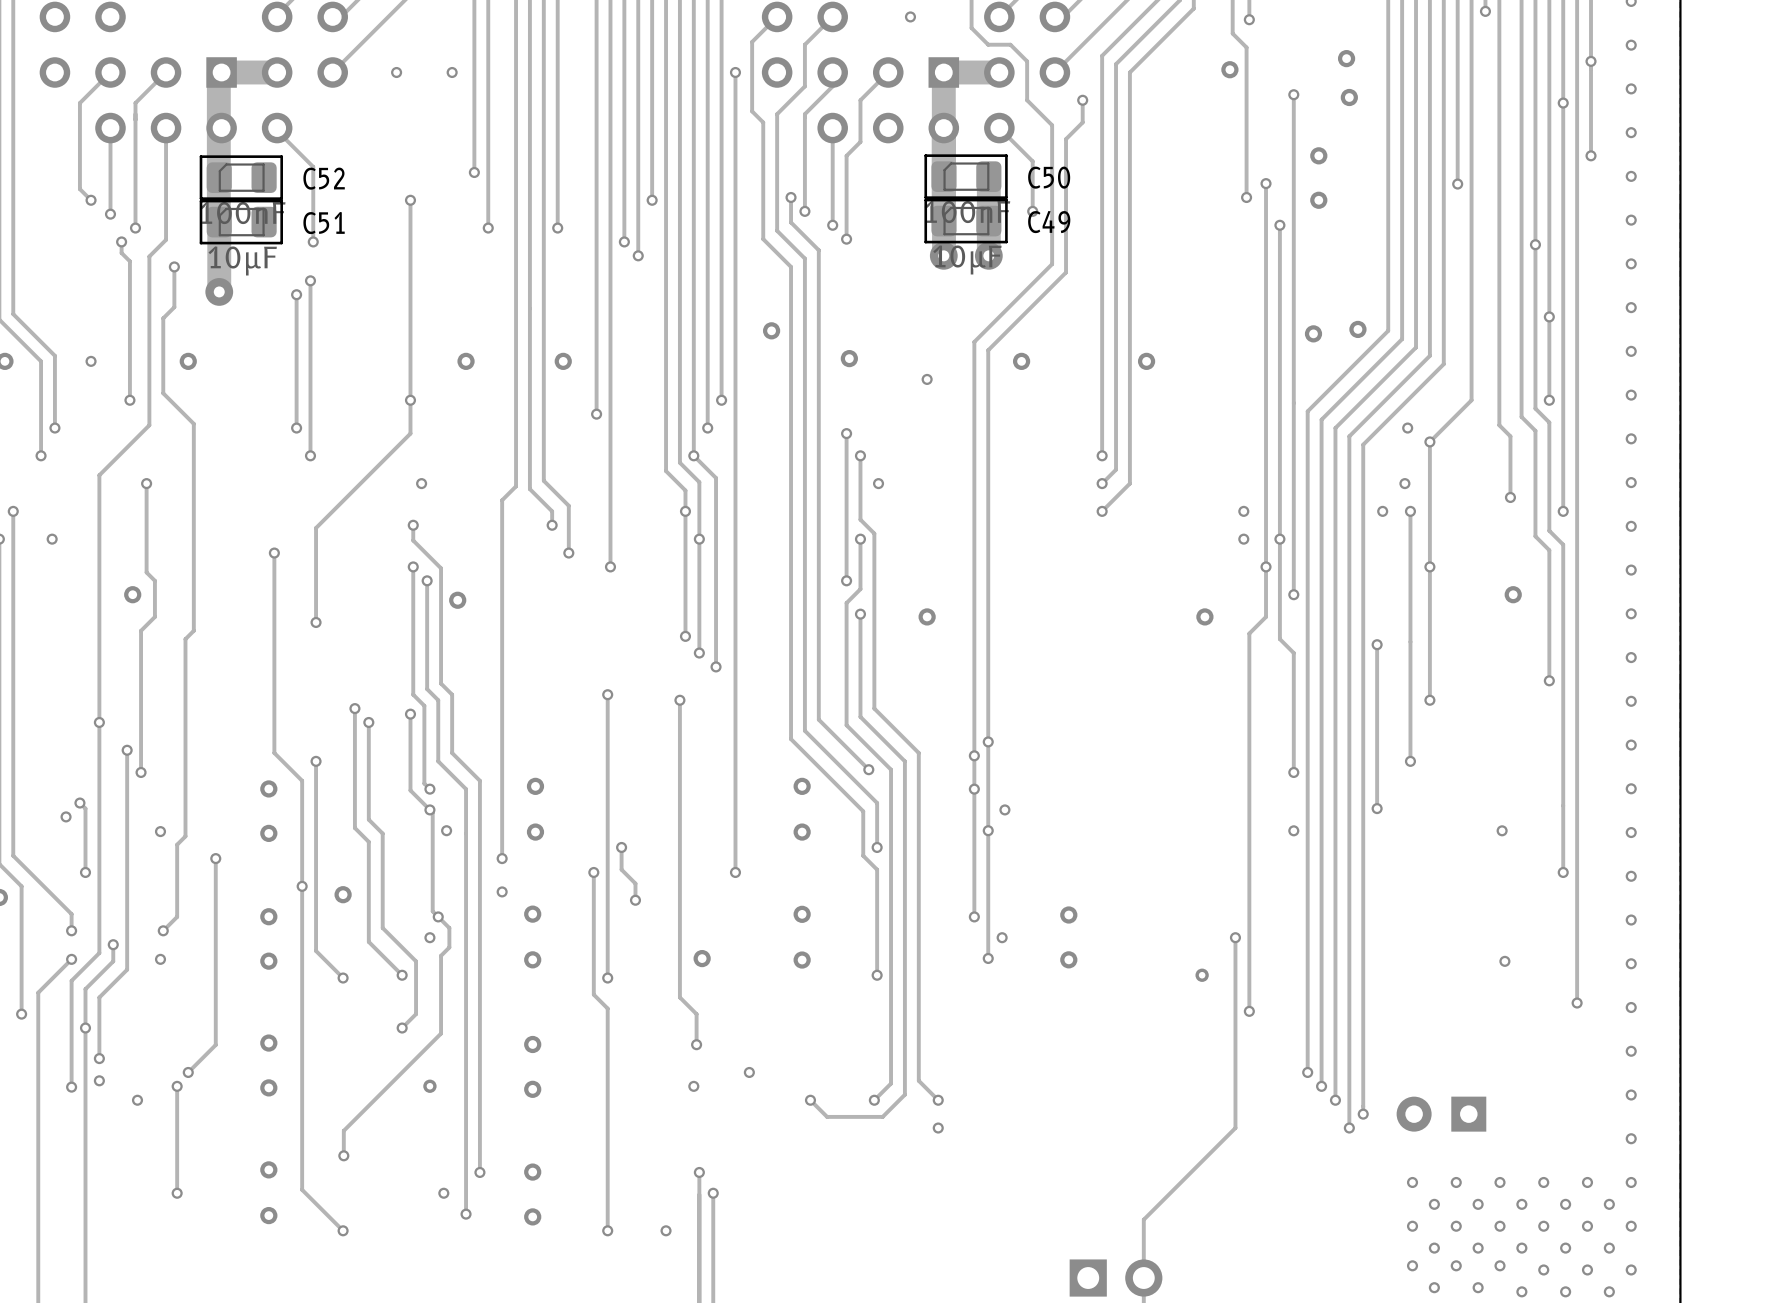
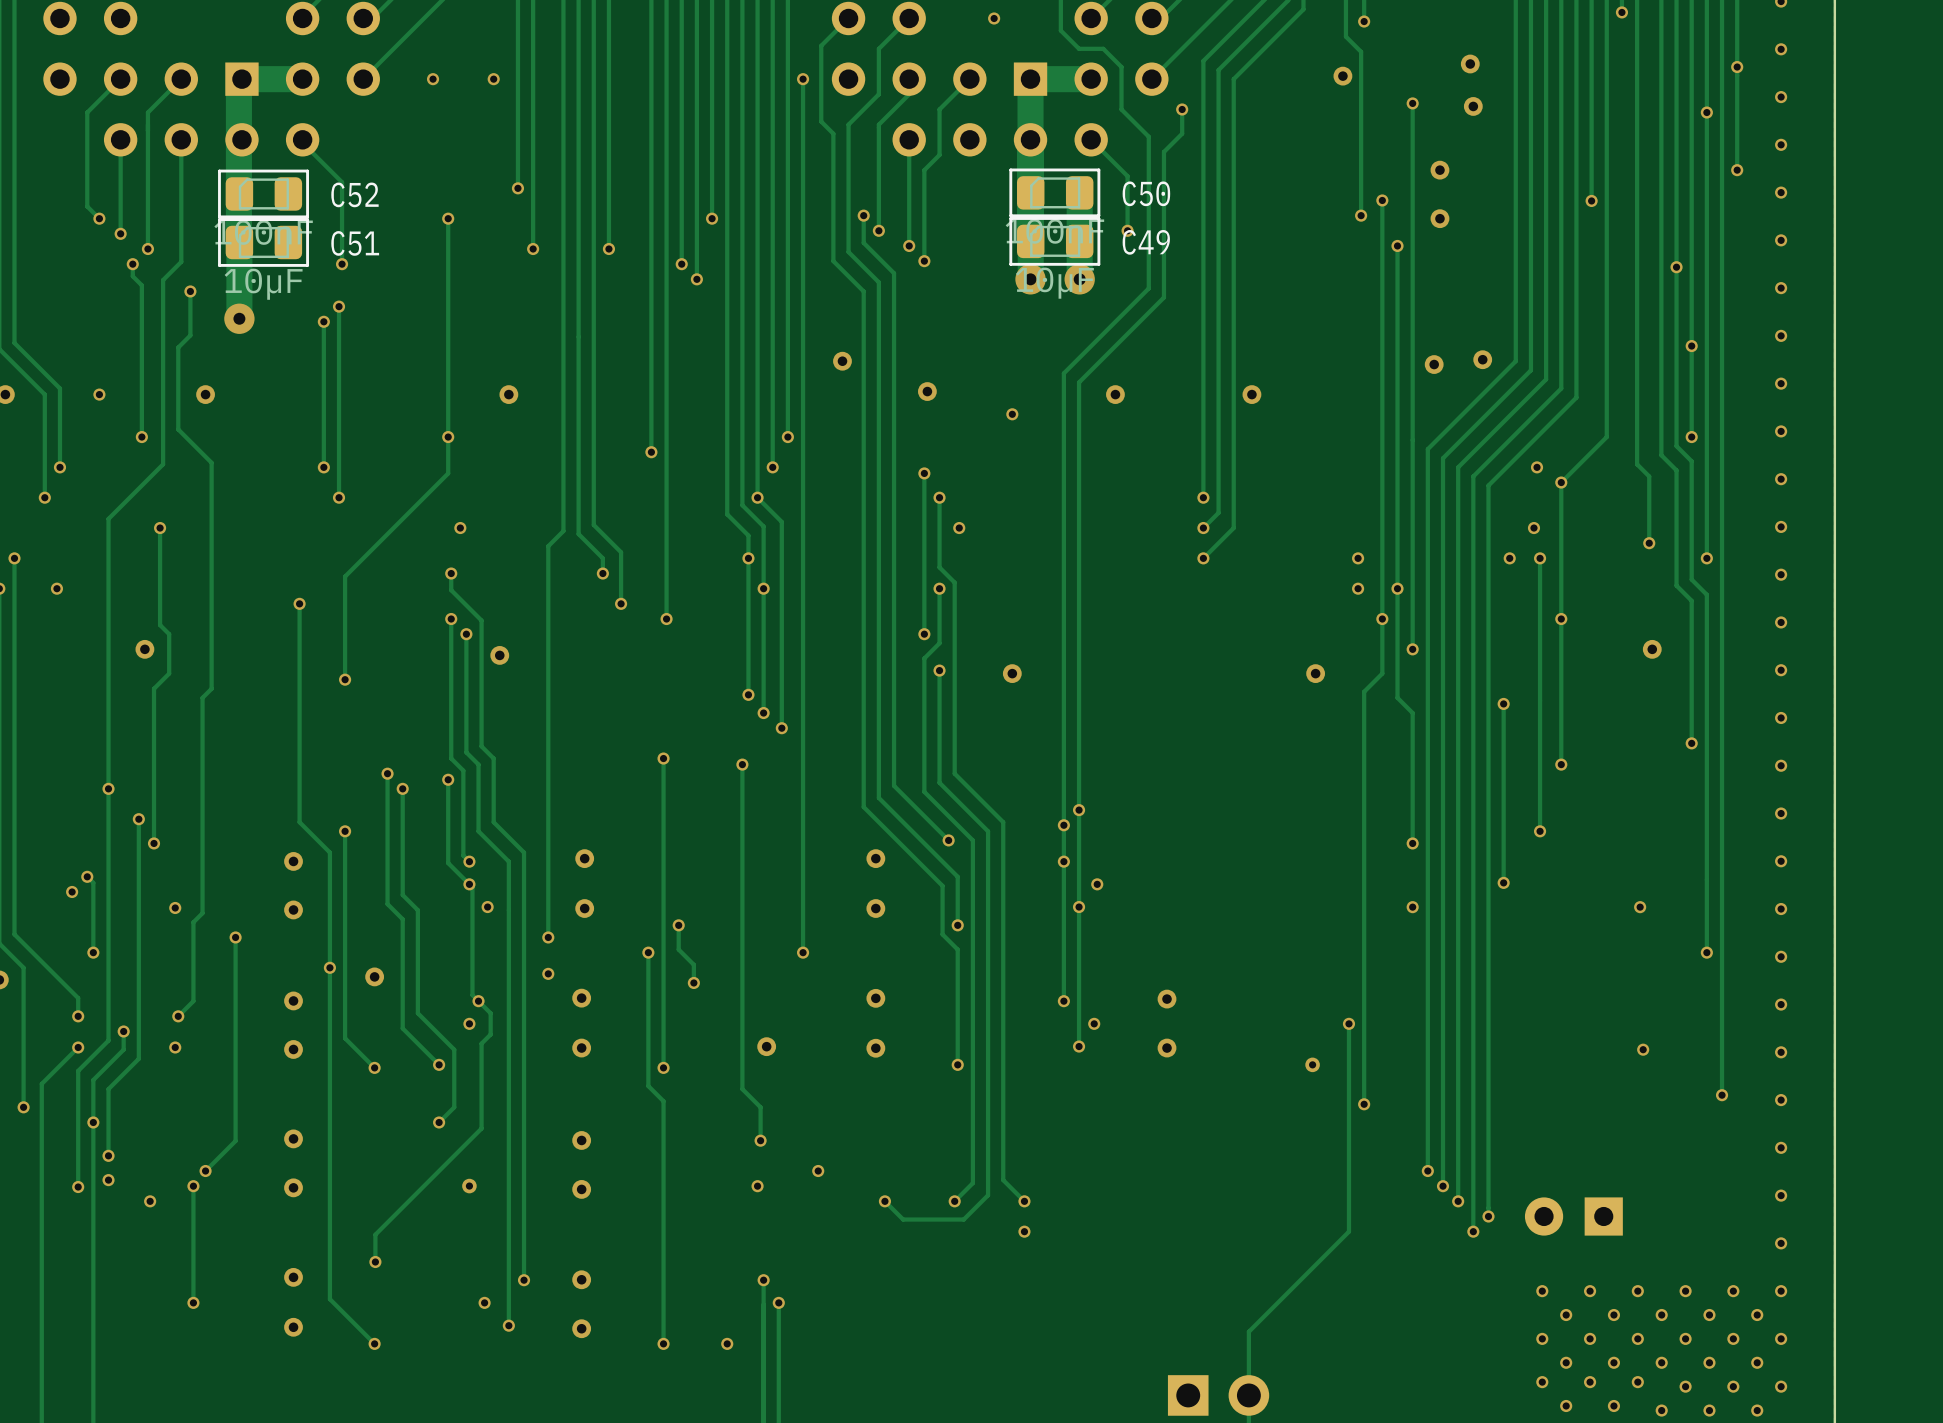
via: (563, 361) -> none

